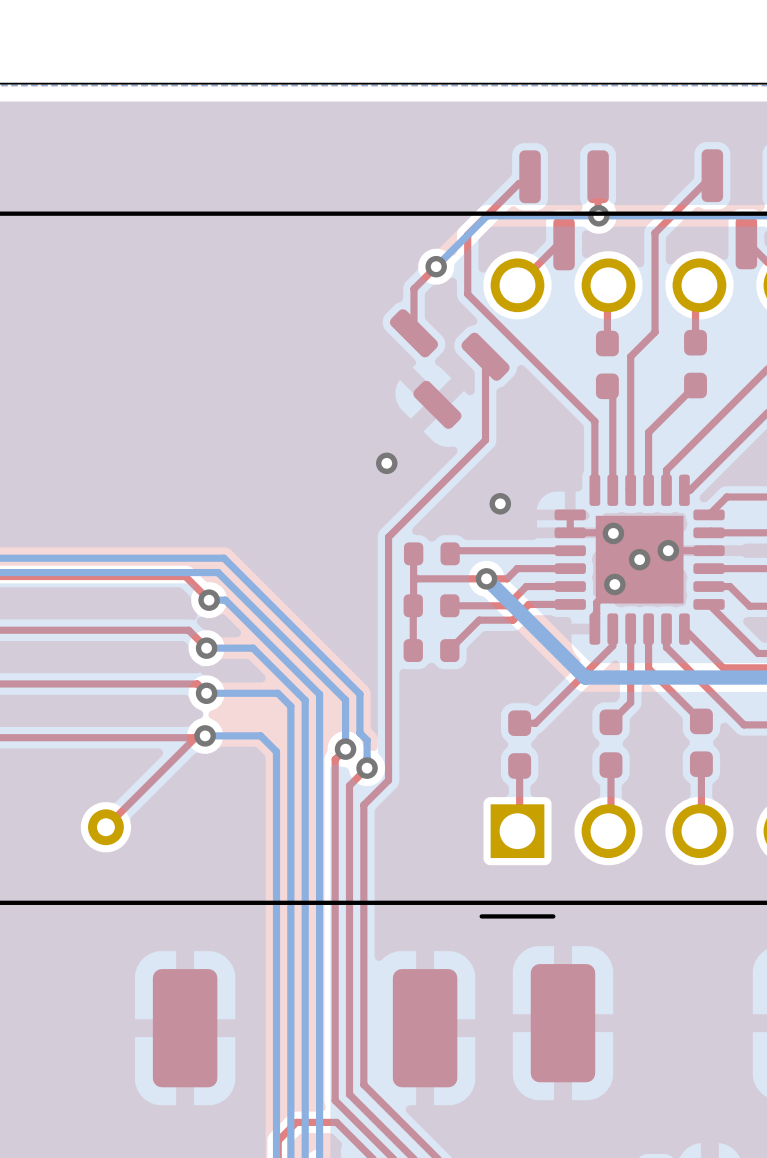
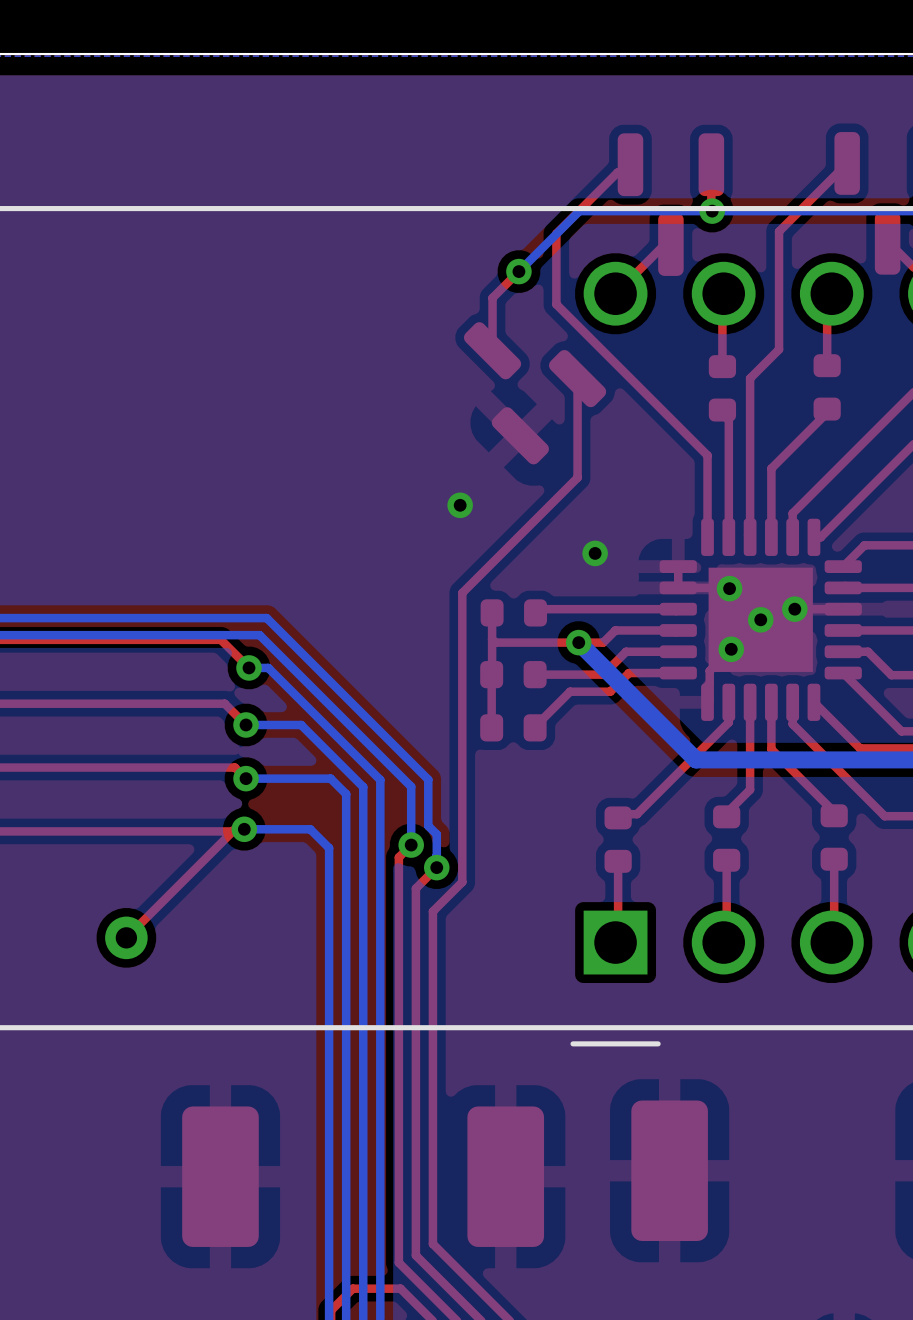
part footprint: [684, 329, 707, 399] -> [813, 354, 841, 421]
part footprint: [595, 330, 619, 400] -> [708, 355, 737, 422]
part footprint: [689, 708, 713, 778] -> [820, 804, 848, 871]
part footprint: [599, 709, 623, 778] -> [713, 805, 741, 872]
part footprint: [508, 710, 532, 779] -> [604, 806, 632, 873]

